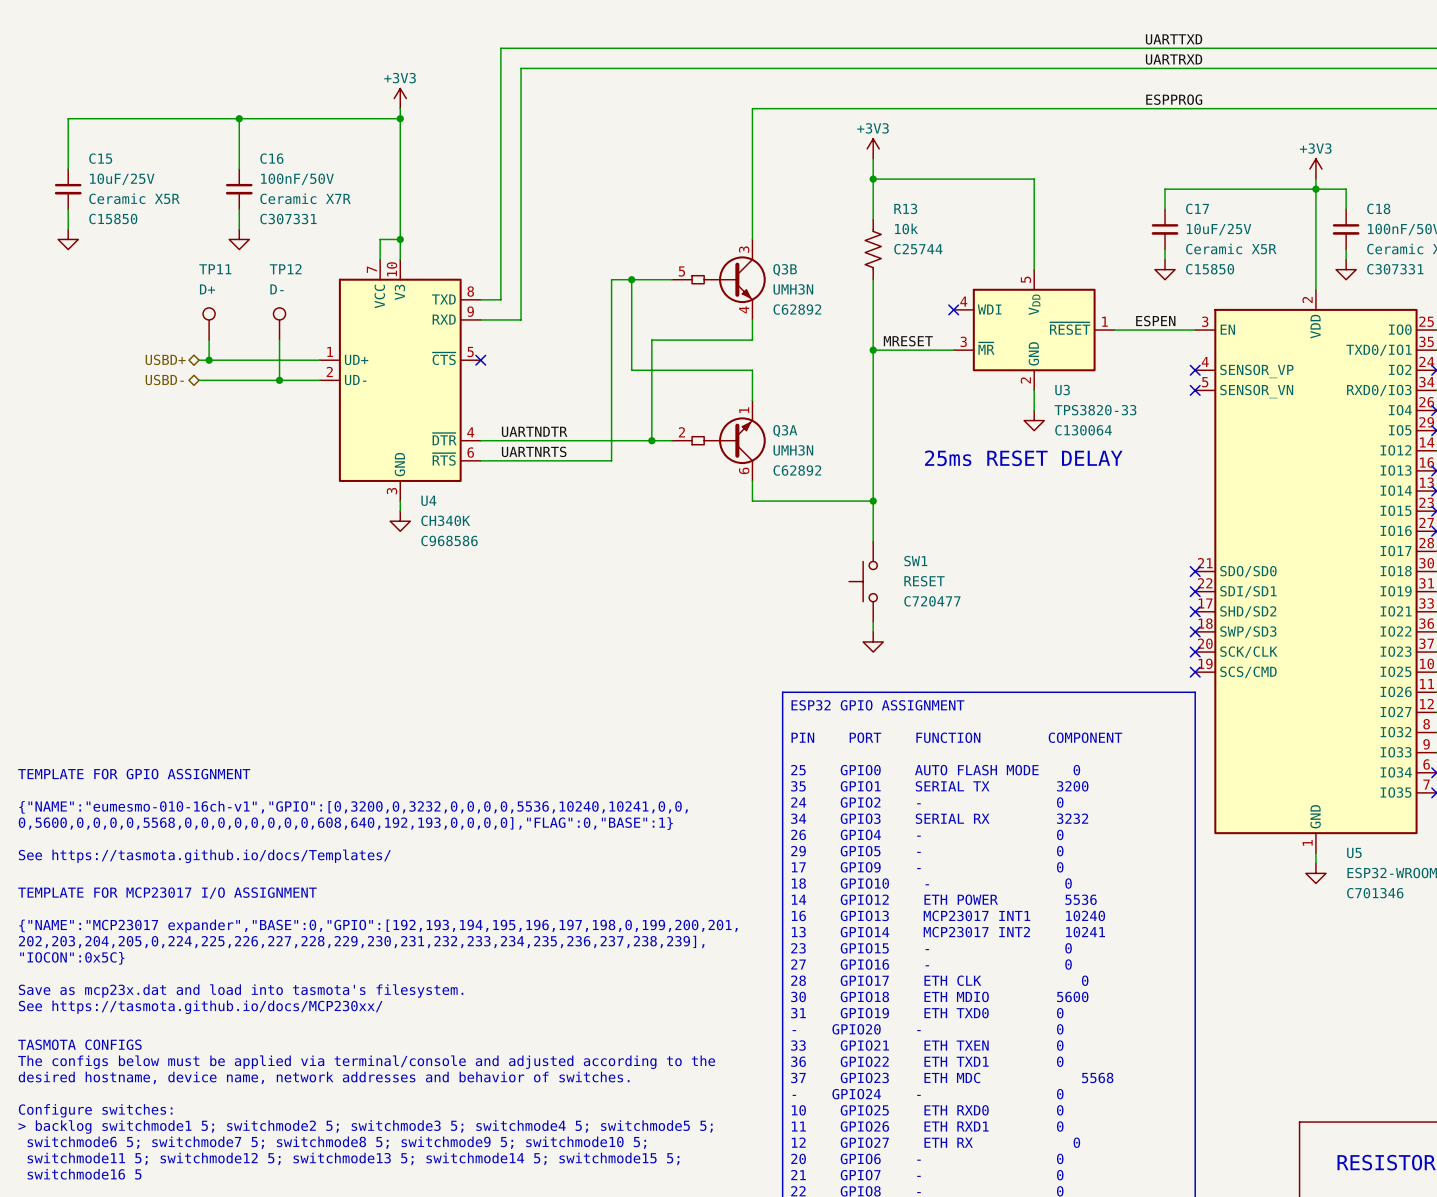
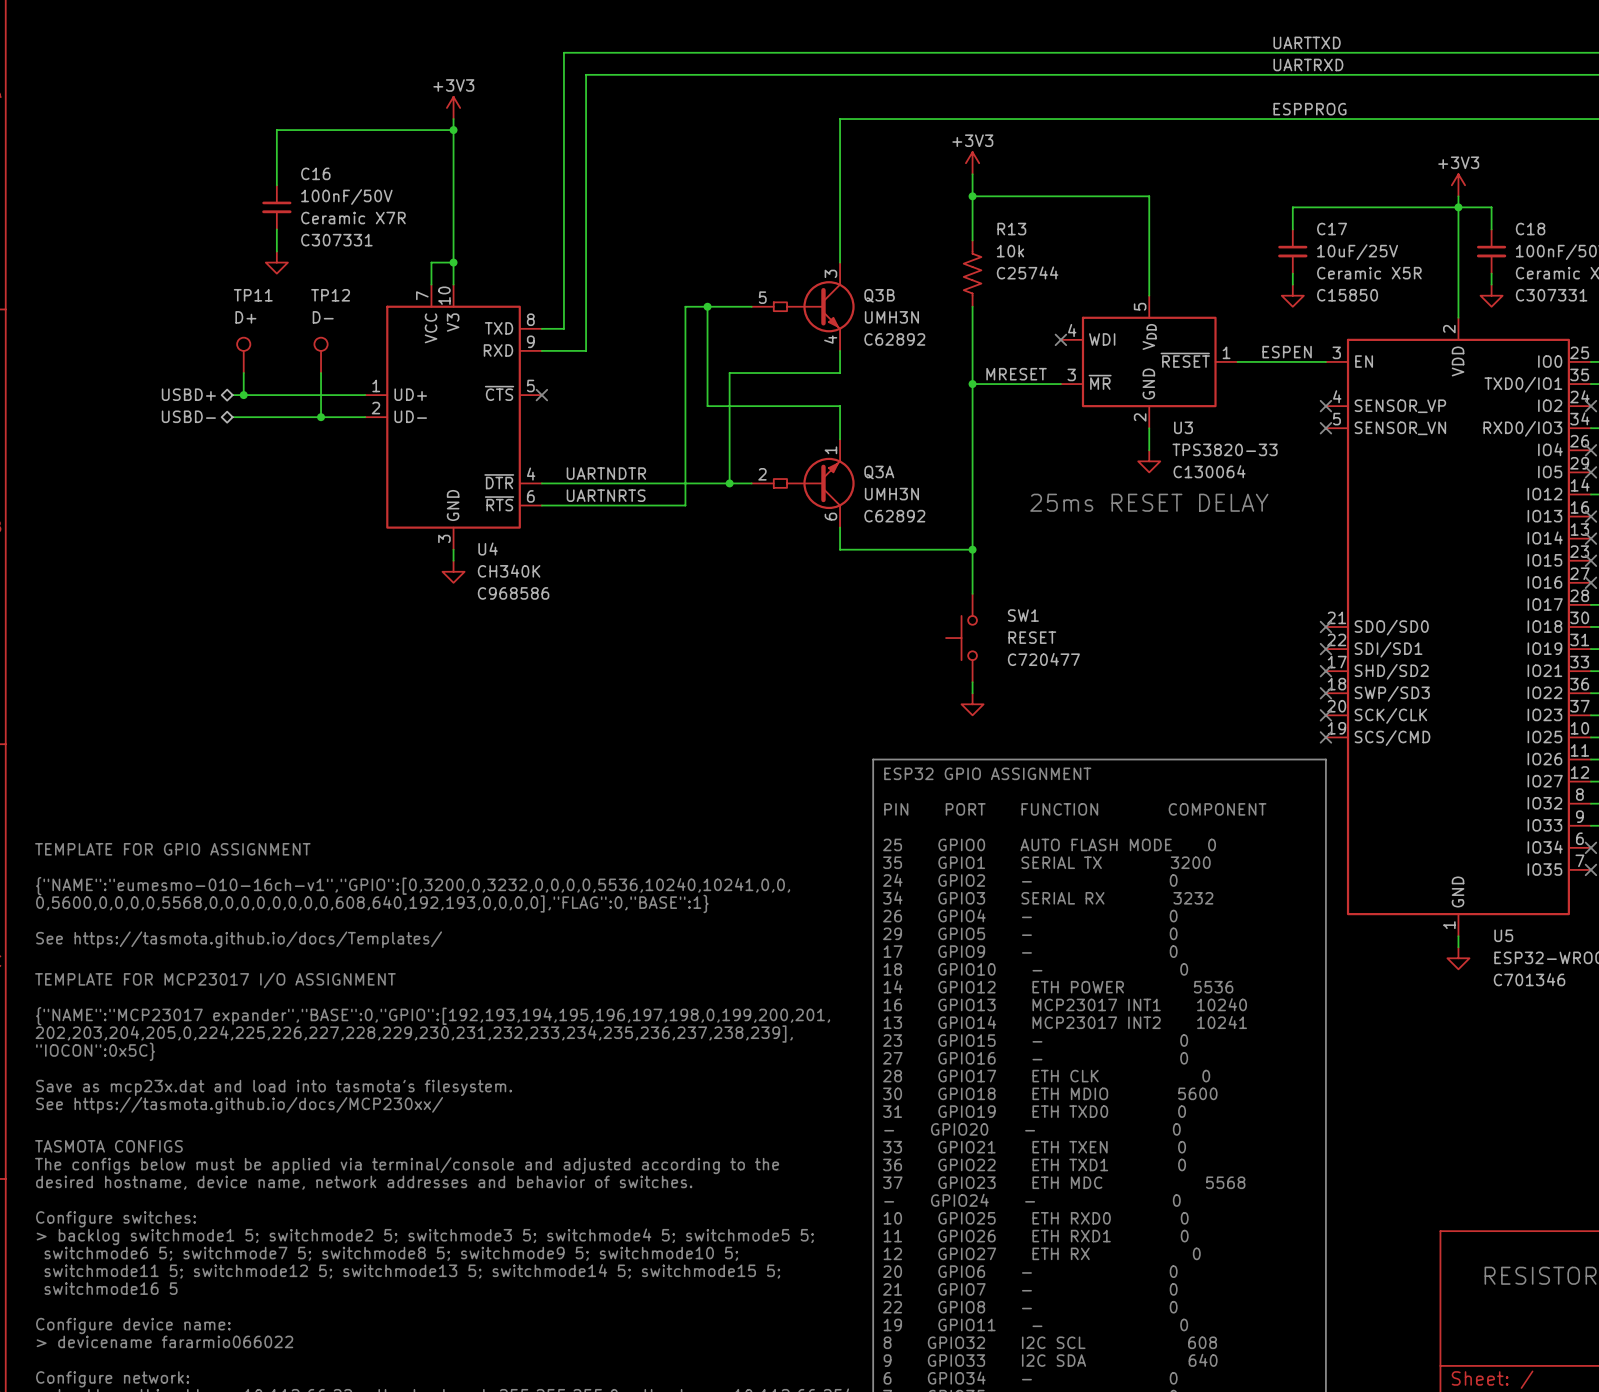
wire: (239, 118) (68, 118) (68, 169) -> none
junction: (239, 118) -> none
C15: 10uF/25V (68, 189) -> none
wire: (68, 209) (68, 229) -> none
power symbol: (68, 239) -> none

